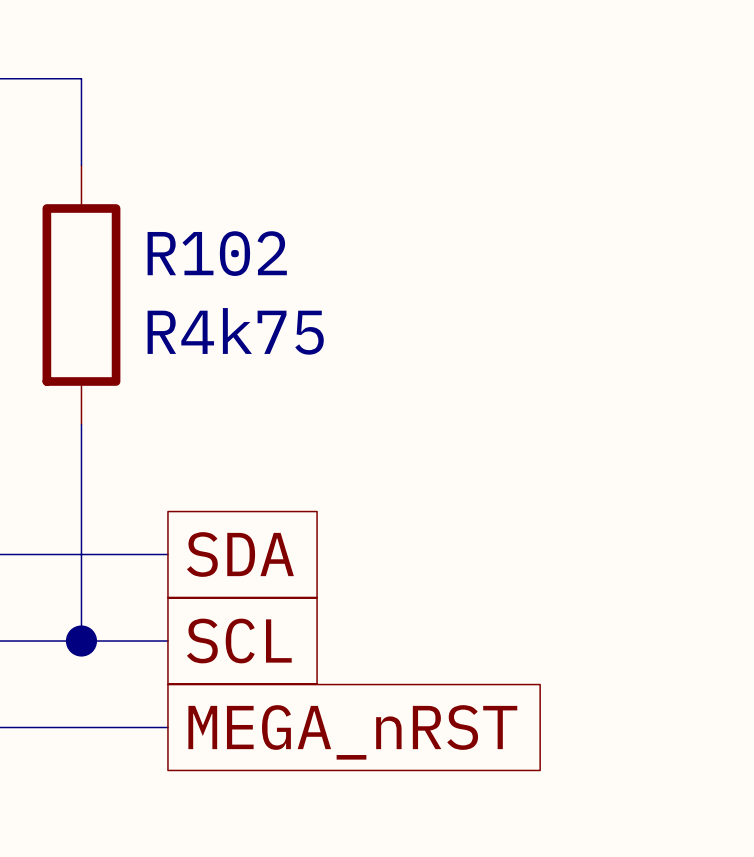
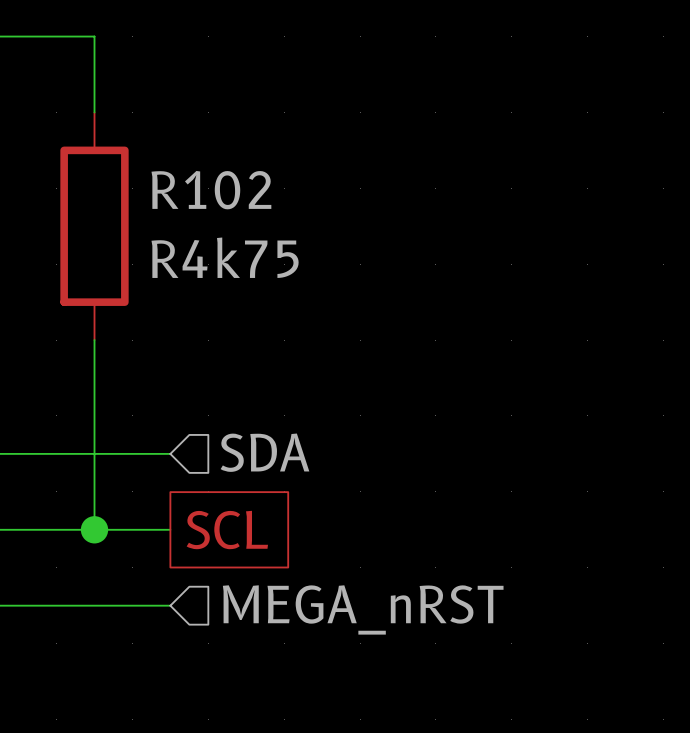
hierarchical label: none -> SDA (264, 452)
global label: SDA (240, 554) -> none
hierarchical label: none -> MEGA_nRST (363, 609)
global label: MEGA_nRST (352, 732) -> none

